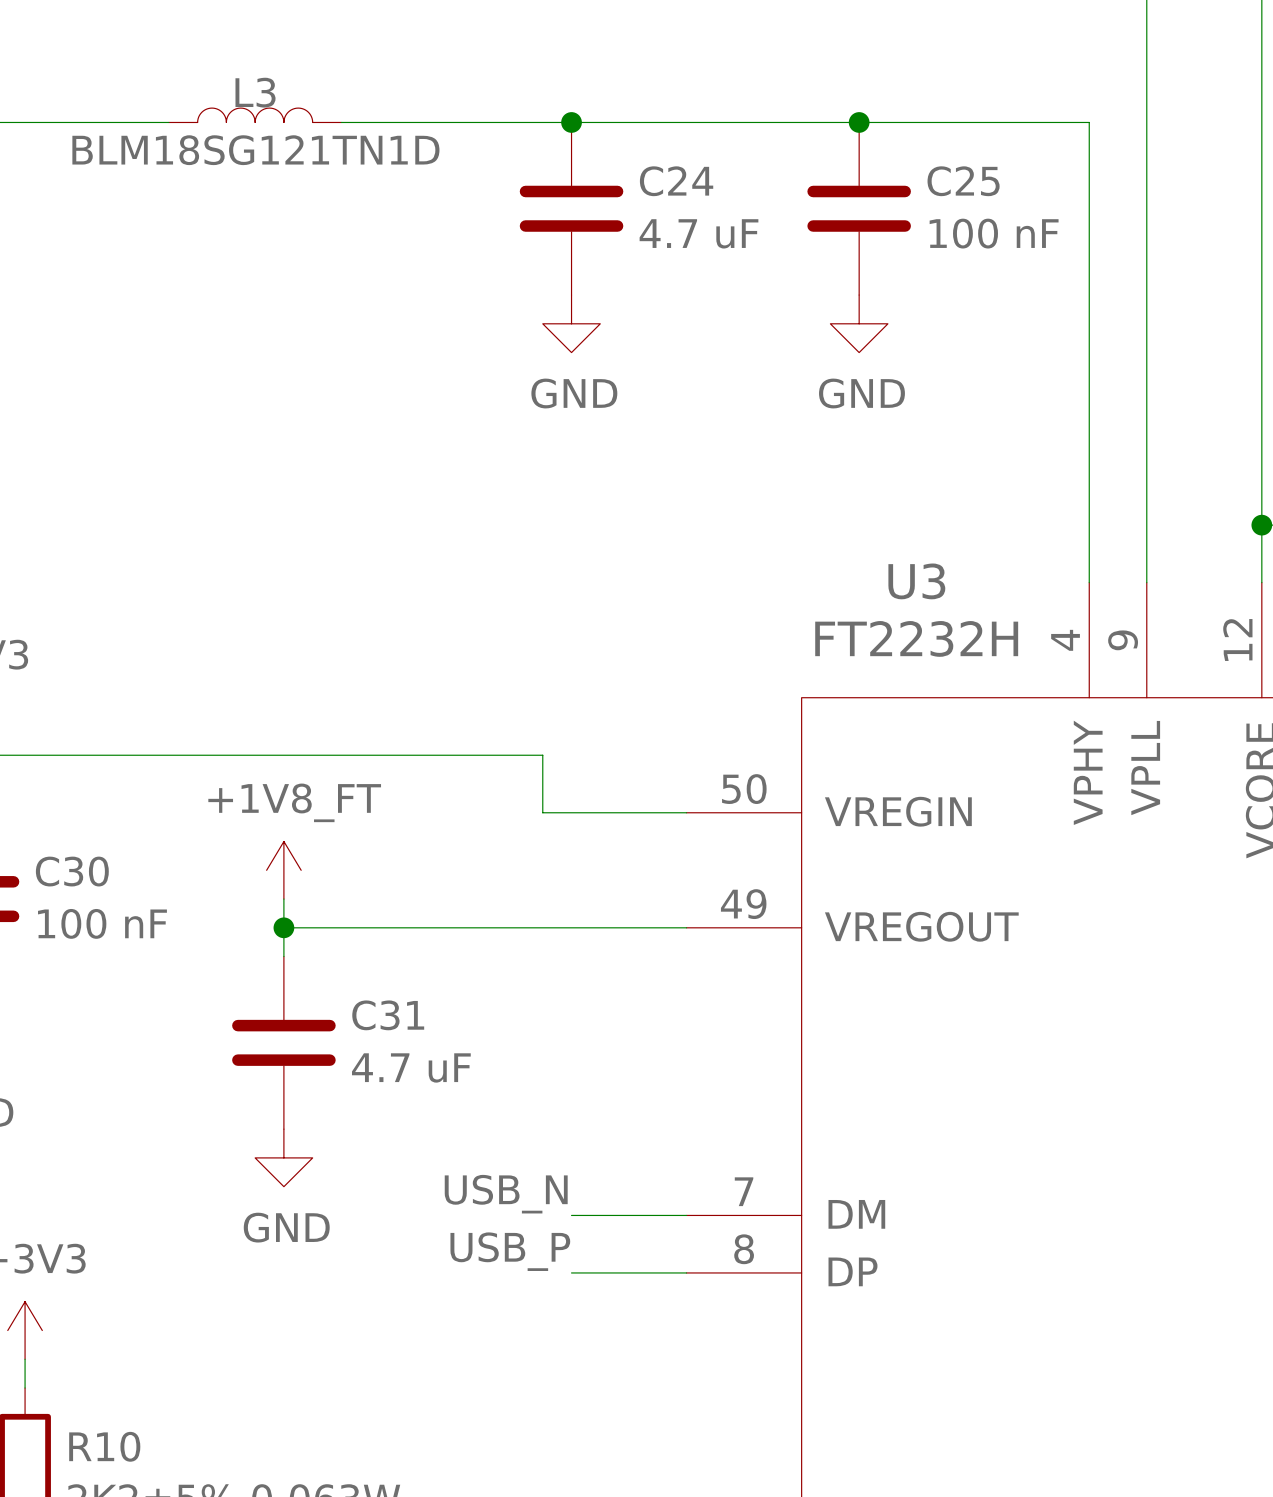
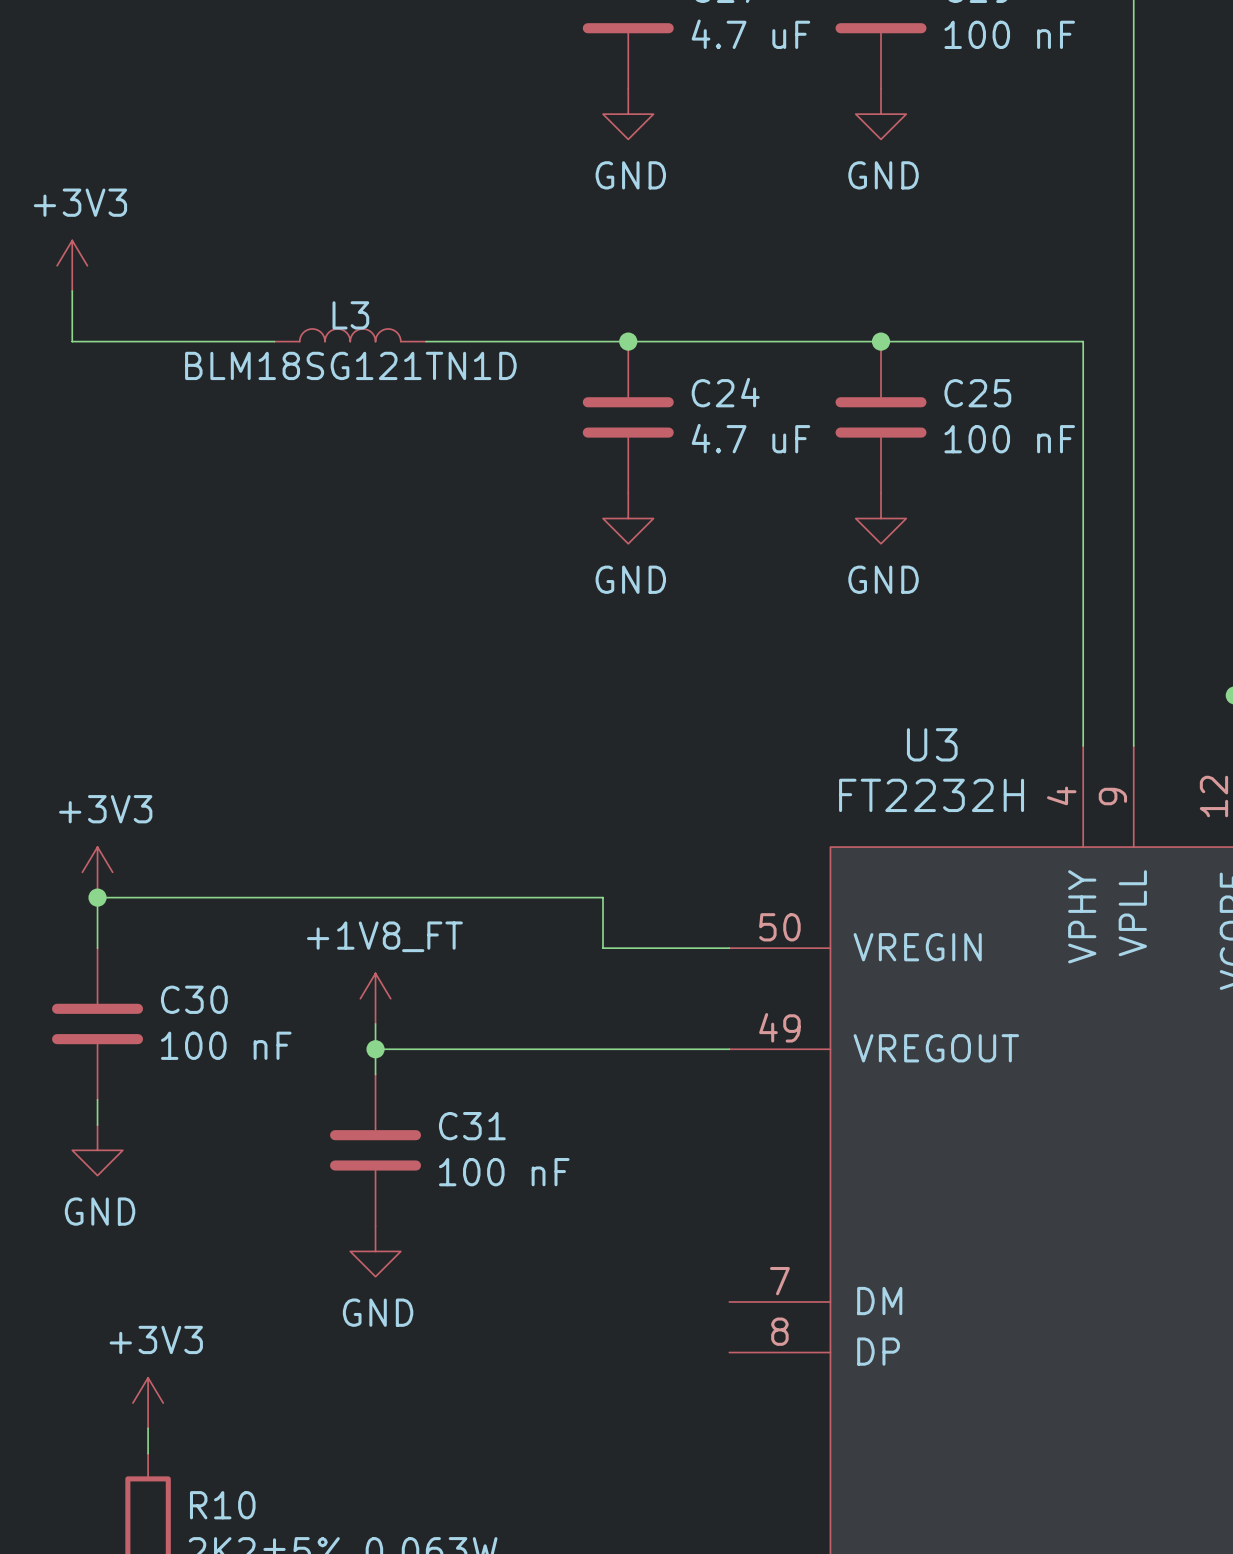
C31 value: 4.7 uF (411, 1067) -> 100 nF (504, 1172)
label: USB_N (506, 1194) -> none
wire: (571, 1215) (686, 1215) -> none
label: USB_P (510, 1251) -> none
wire: (571, 1272) (686, 1272) -> none

